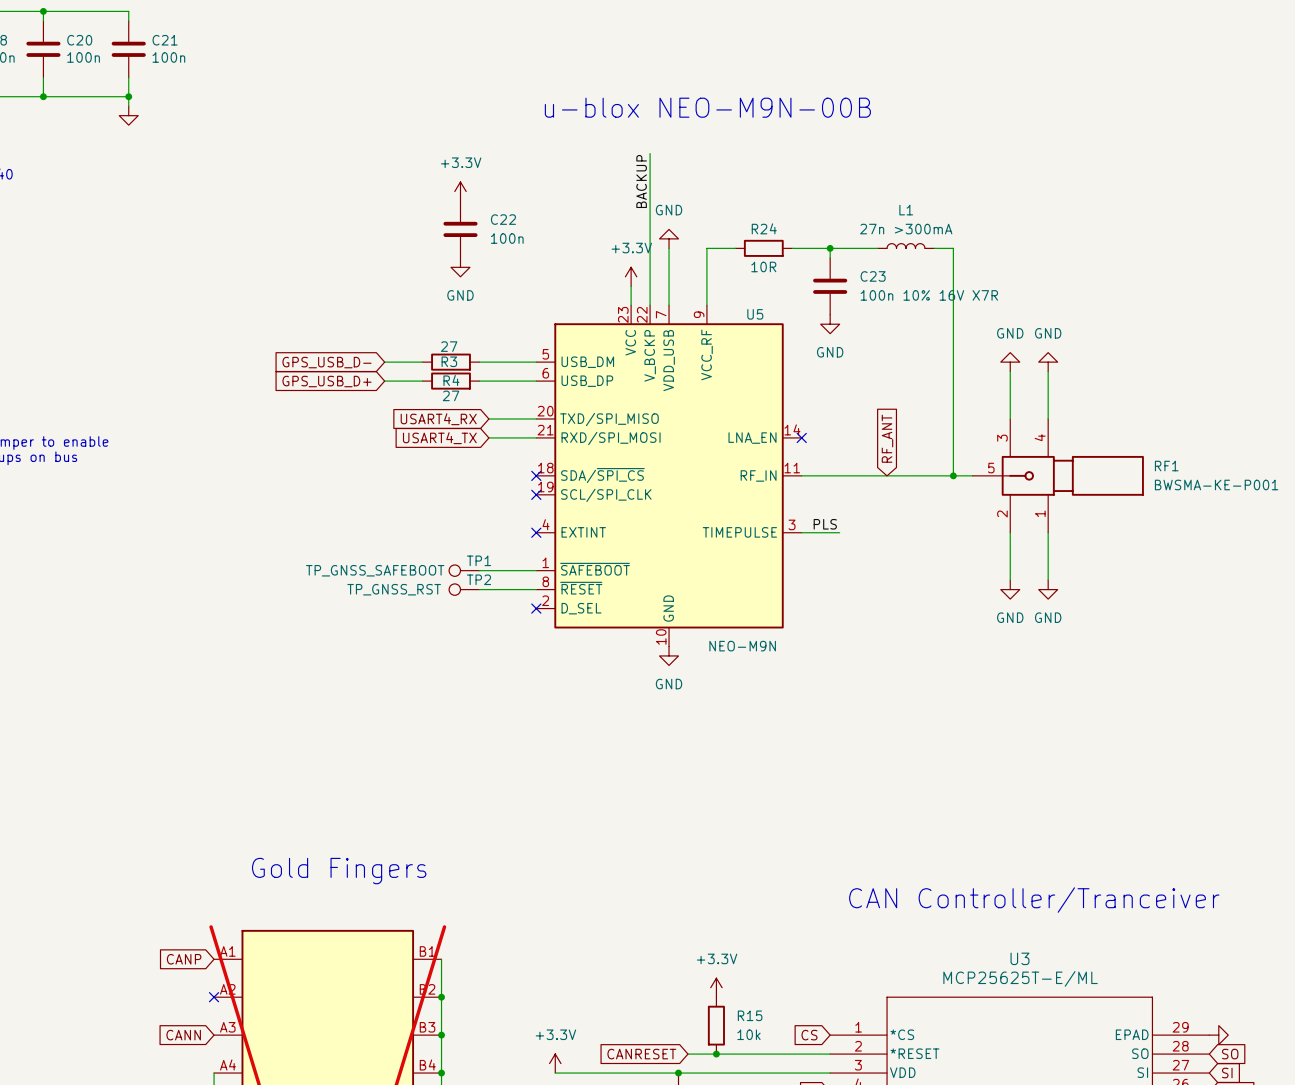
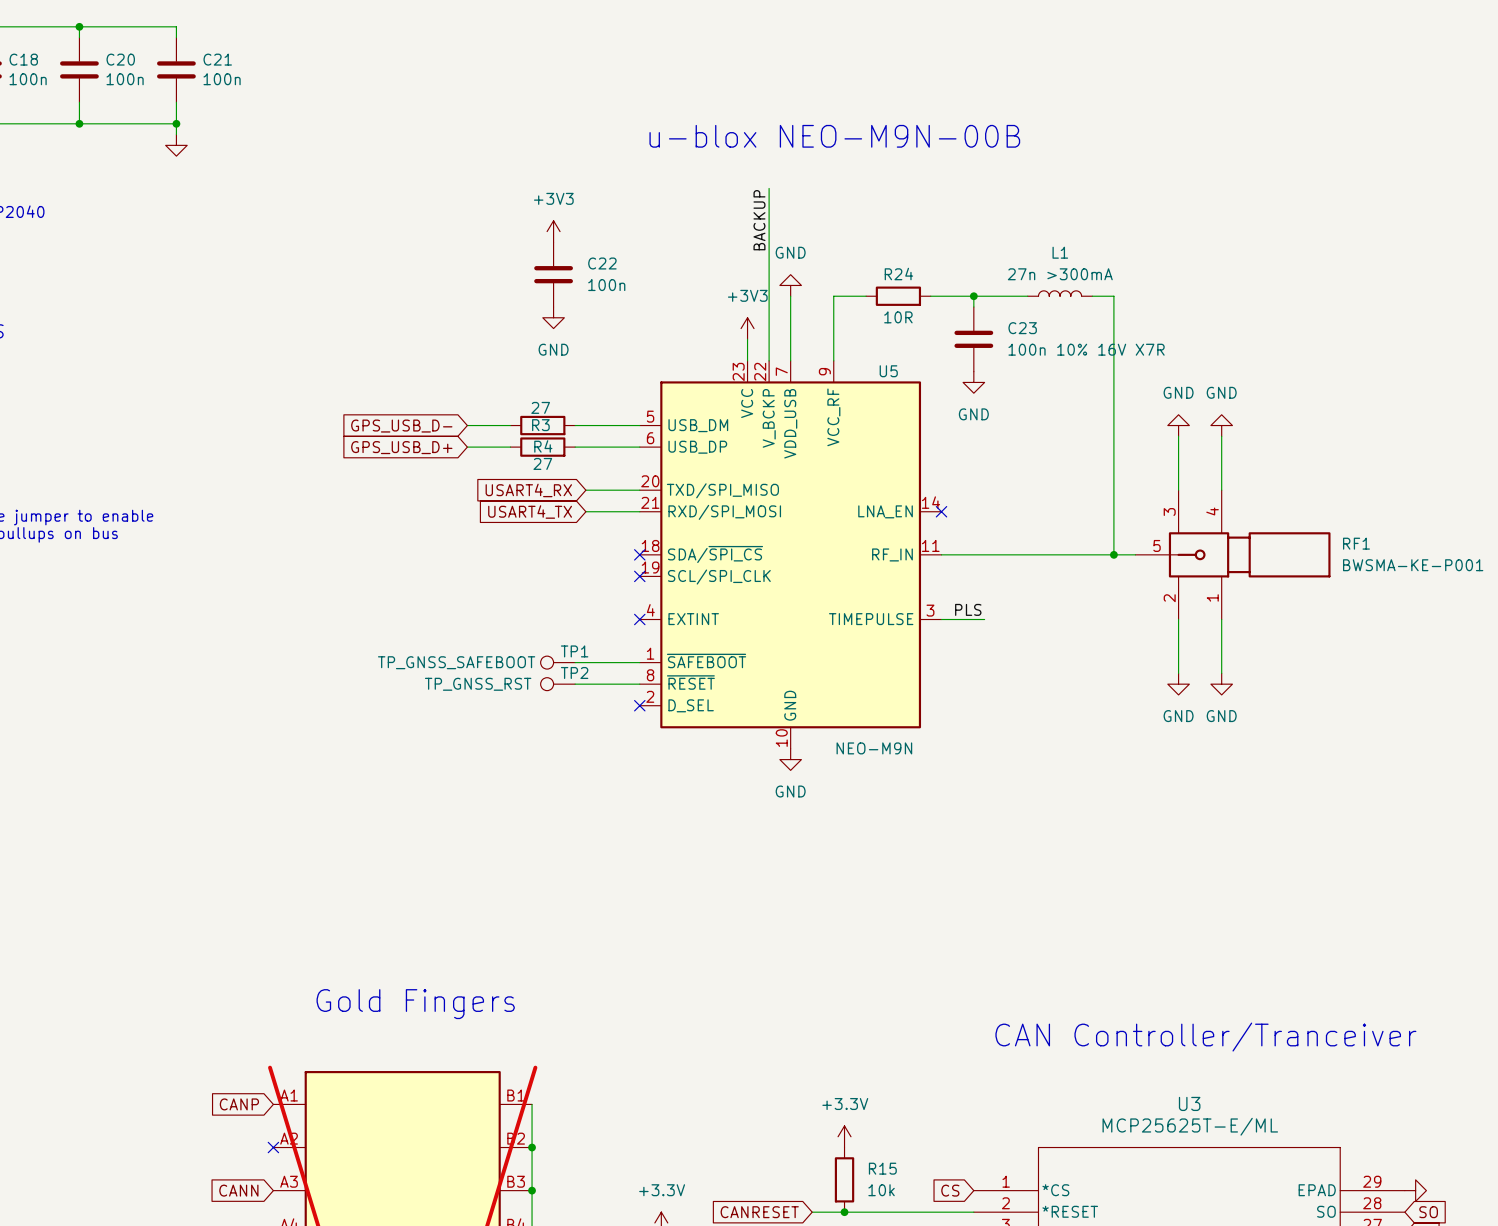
power symbol: +3.3V (460, 191) -> +3V3 (553, 231)
power symbol: +3.3V (631, 276) -> +3V3 (747, 328)
global label: RF_ANT (887, 438) -> none

